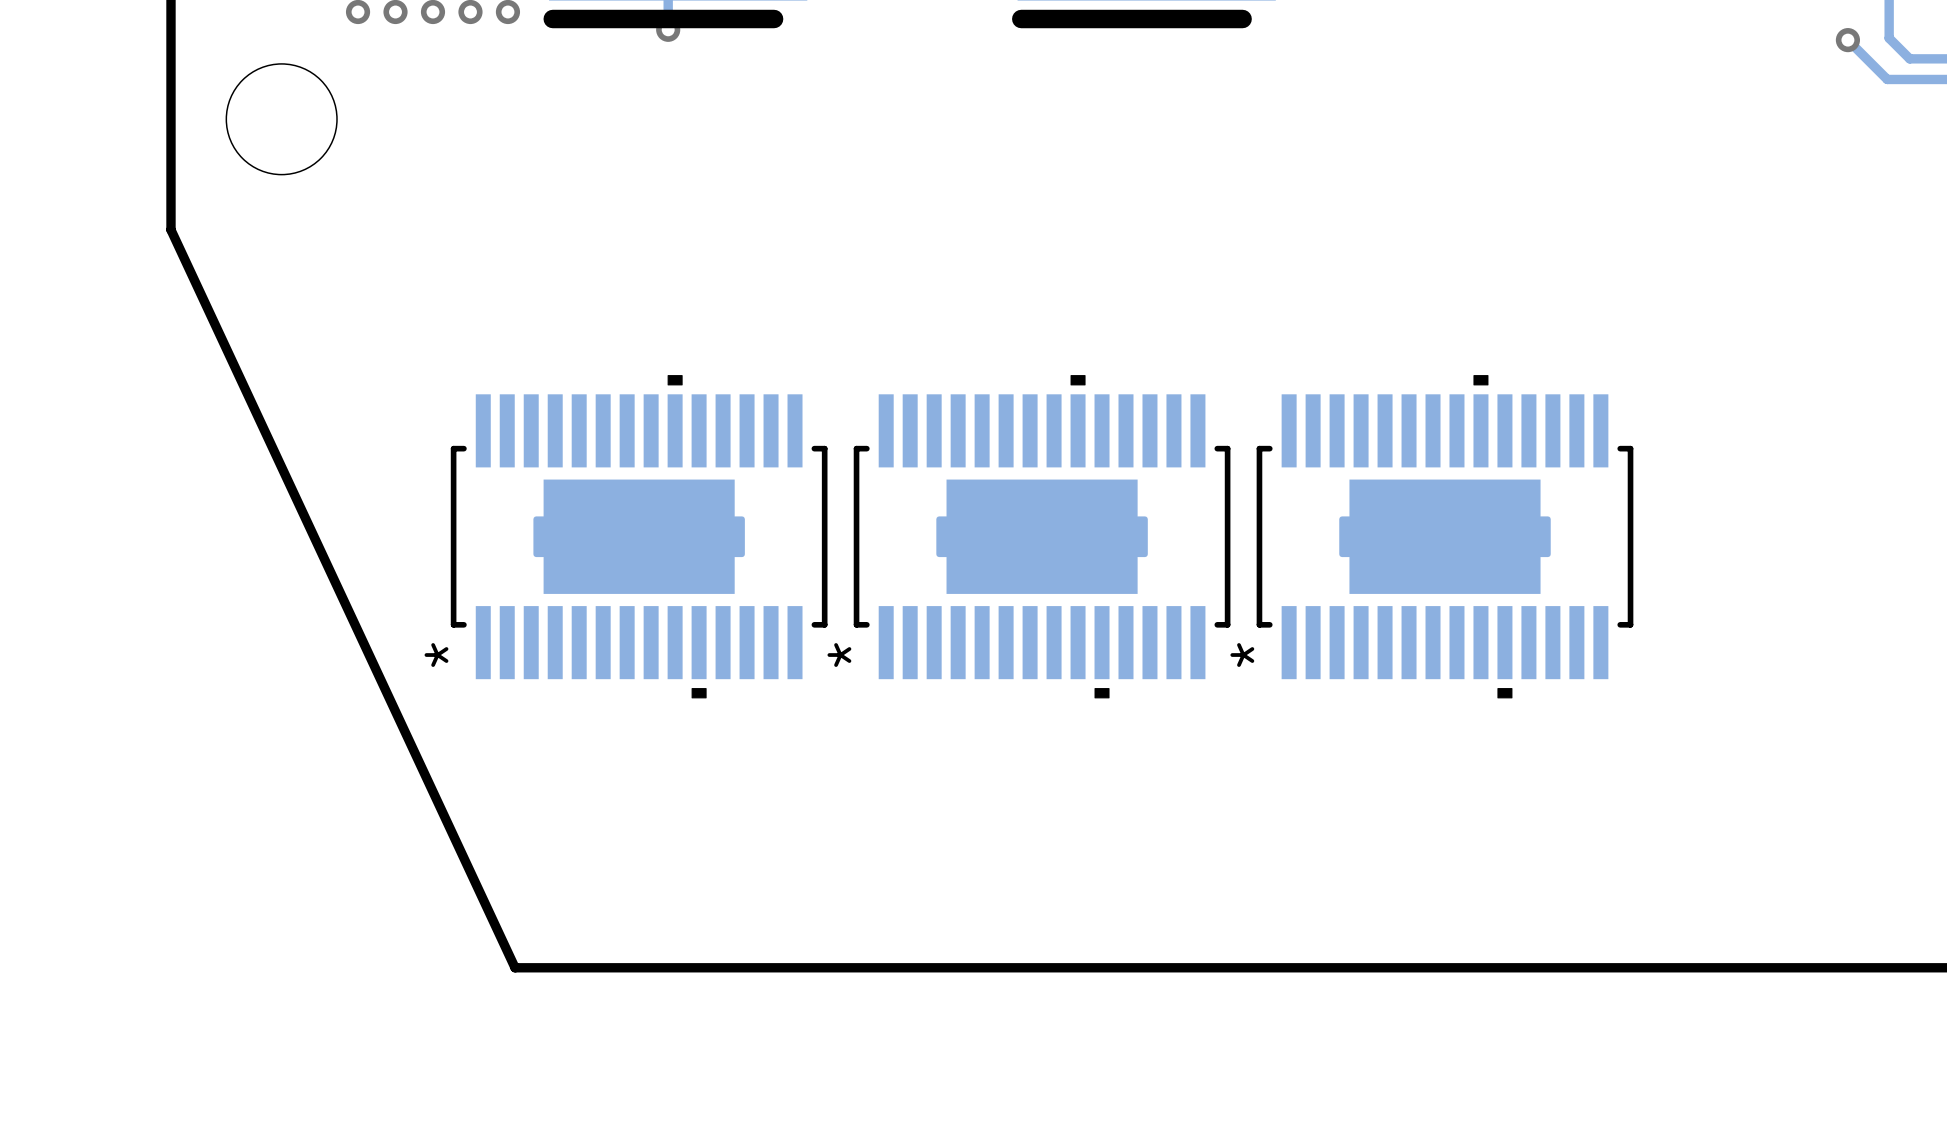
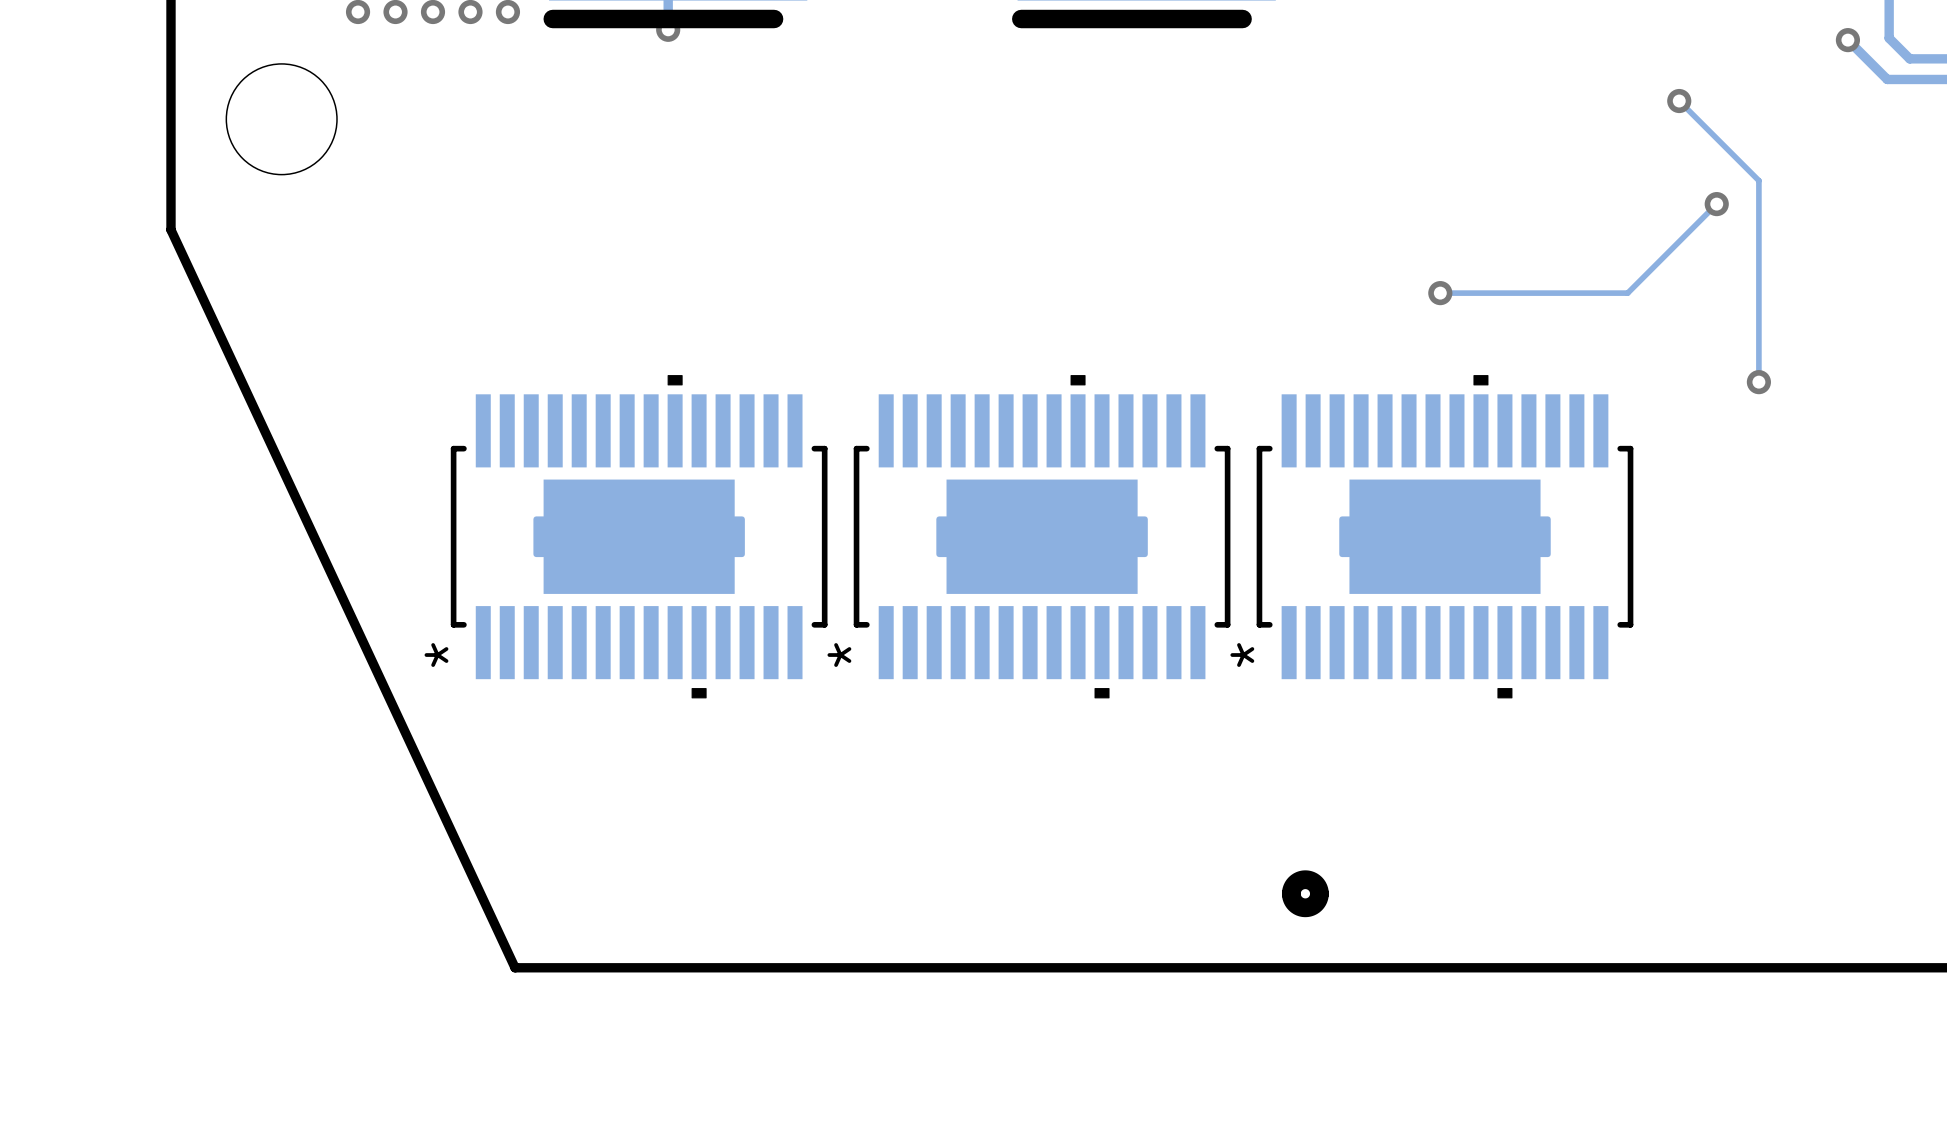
track: none -> (1679, 101) (1758, 180) (1758, 382)
via: none -> (1679, 101)
track: none -> (1716, 204) (1627, 293) (1440, 293)
via: none -> (1716, 204)
via: none -> (1440, 293)
via: none -> (1758, 382)
part: none -> (1305, 893)

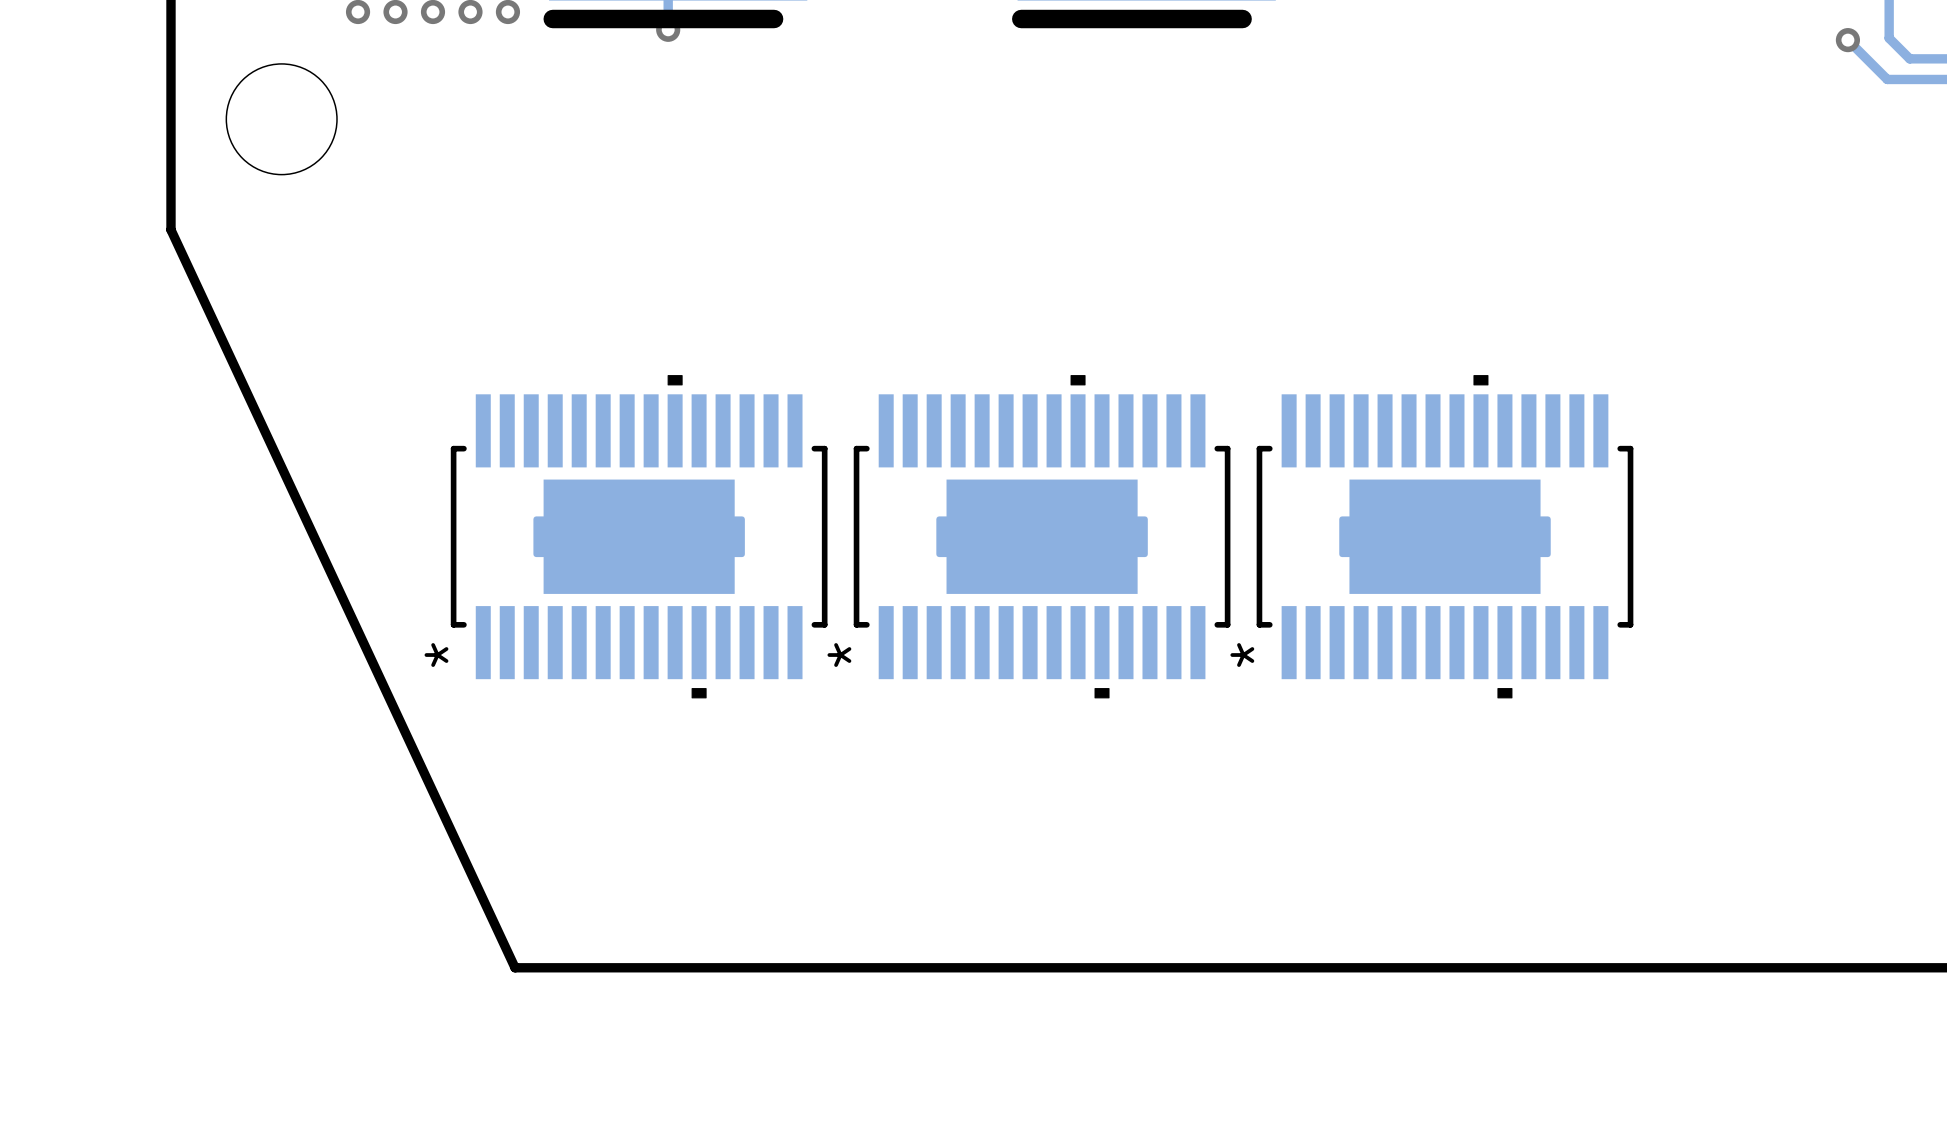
track: (1679, 101) (1758, 180) (1758, 382) -> none
via: (1679, 101) -> none
track: (1716, 204) (1627, 293) (1440, 293) -> none
via: (1716, 204) -> none
via: (1440, 293) -> none
via: (1758, 382) -> none
part: (1305, 893) -> none

